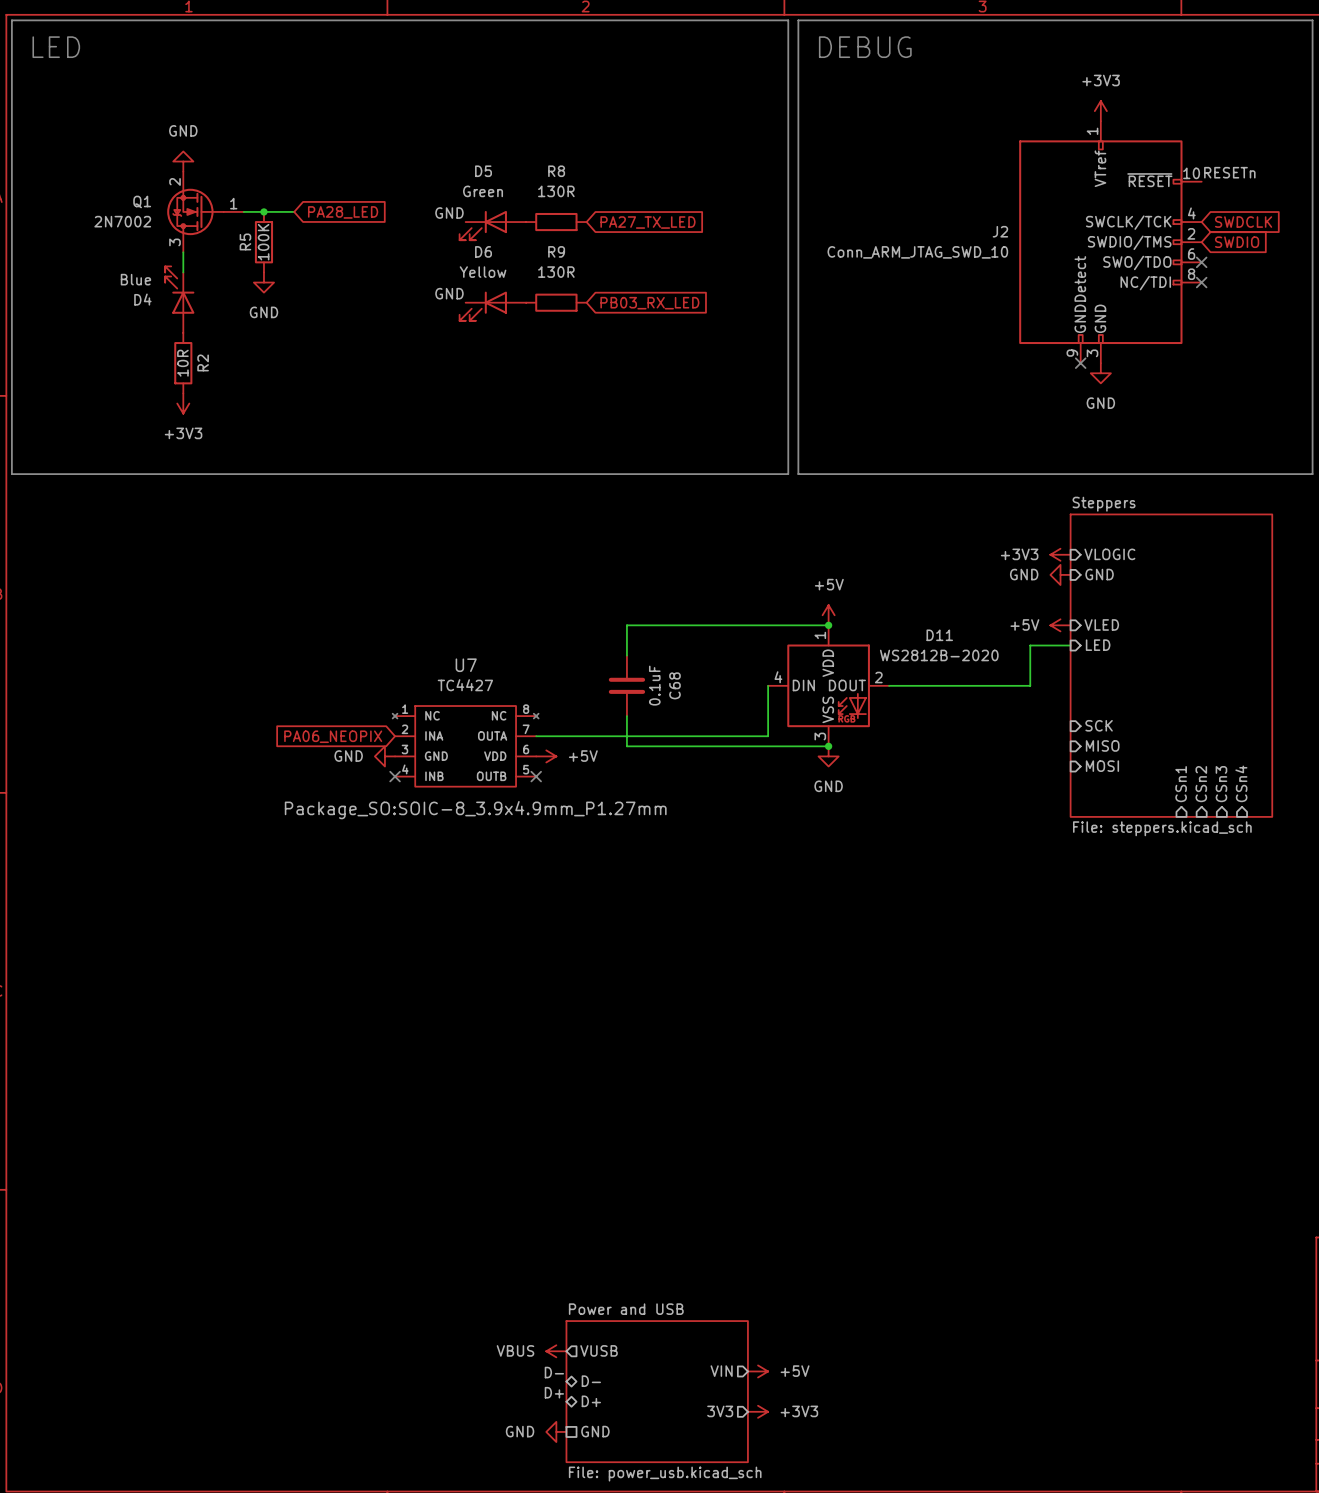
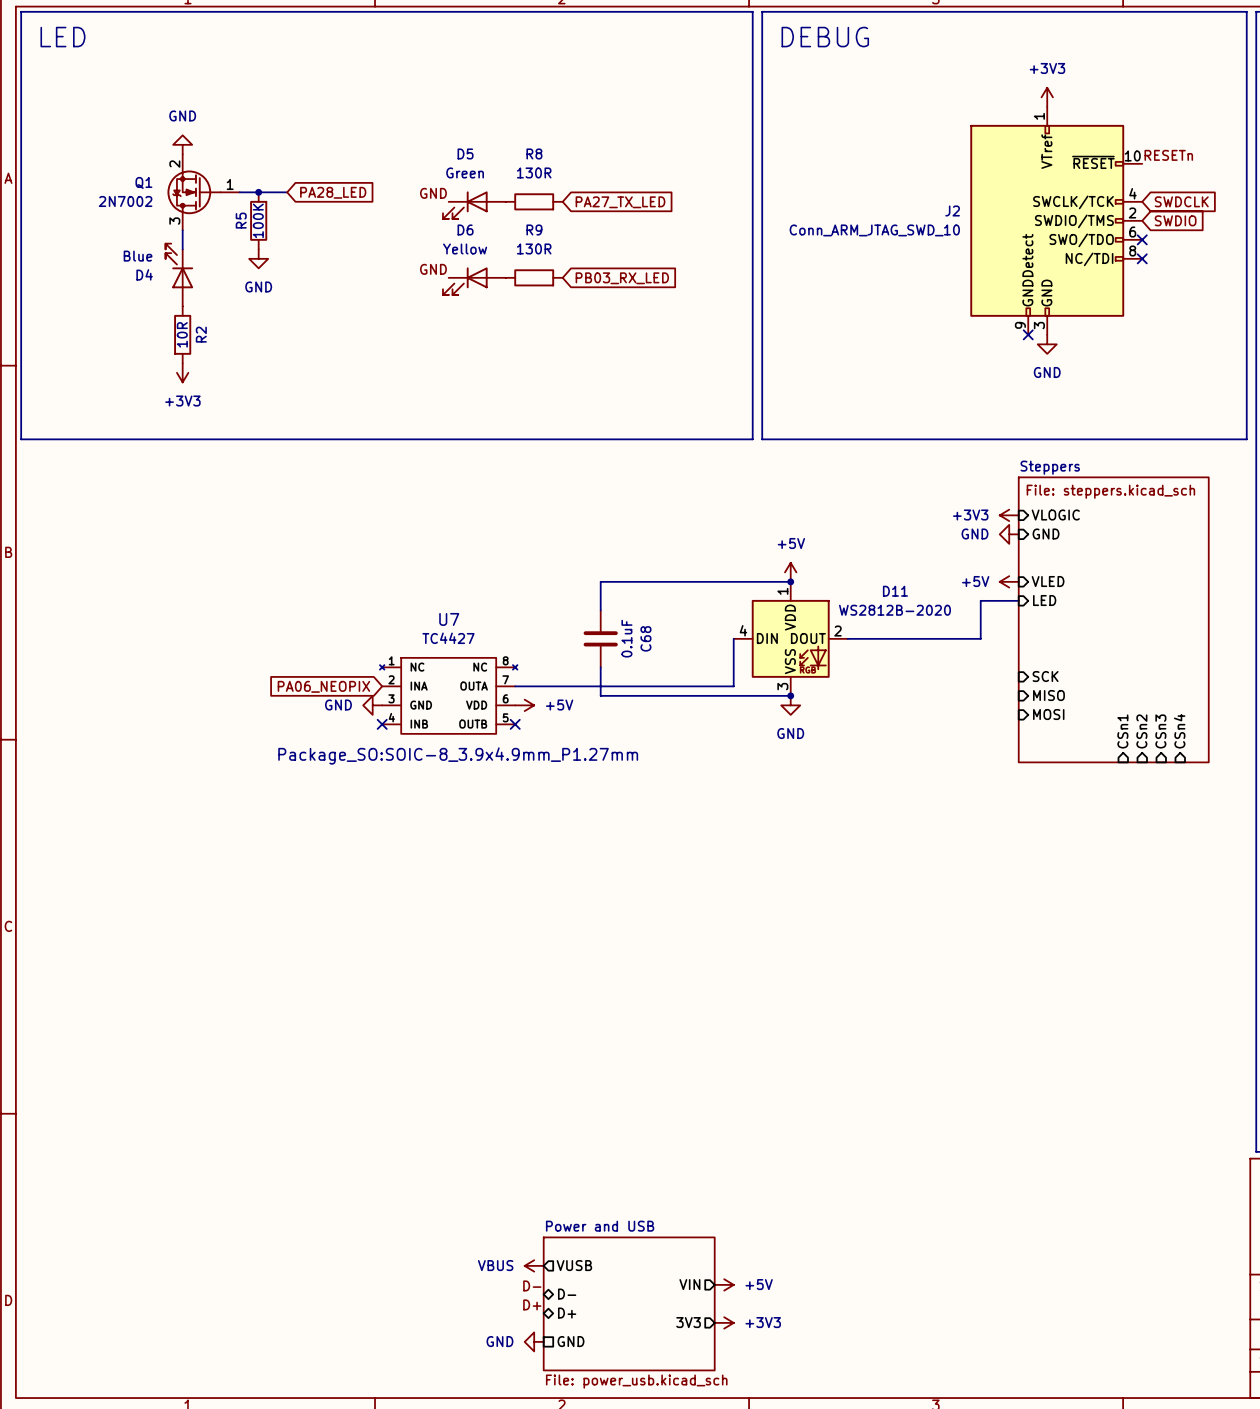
sheet Steppers value position: File: steppers.kicad_sch (1162, 828) -> File: steppers.kicad_sch (1110, 491)

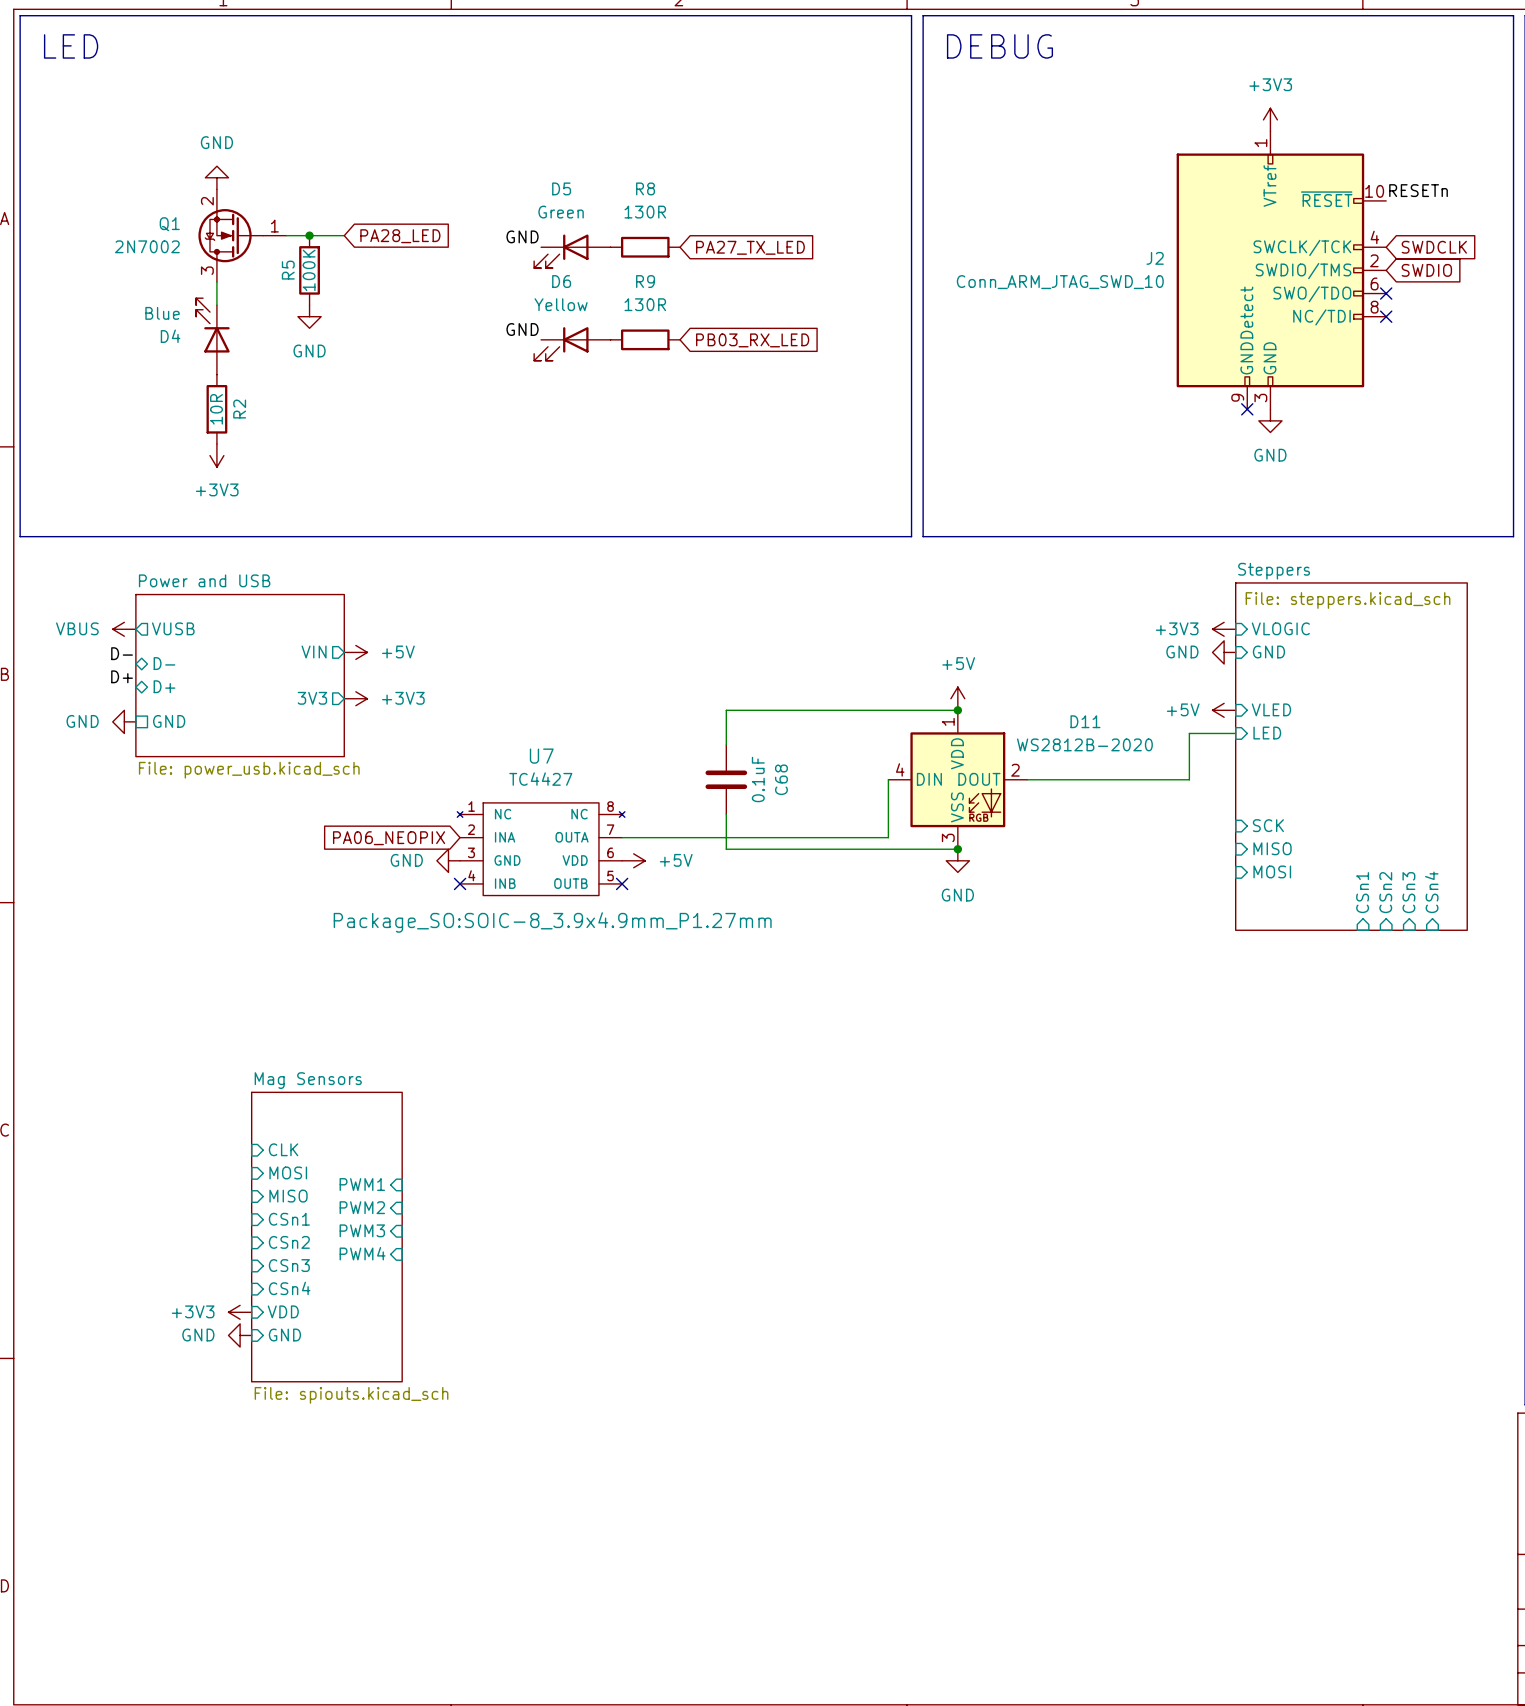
power symbol: none -> VBUS (124, 629)
sheet pin: none -> VUSB (173, 628)
sheet pin: none -> VIN (314, 651)
power symbol: none -> +5V (355, 652)
label: none -> D- (122, 653)
sheet pin: none -> D- (164, 663)
sheet Power and USB: none -> File: power_usb.kicad_sch (240, 675)
label: none -> D+ (122, 676)
sheet pin: none -> D+ (164, 686)
sheet pin: none -> 3V3 (312, 698)
power symbol: none -> +3V3 (355, 698)
power symbol: none -> GND (124, 721)
sheet pin: none -> GND (169, 721)
sheet pin: none -> CLK (283, 1149)
sheet pin: none -> MOSI (288, 1172)
sheet pin: none -> PWM1 (362, 1184)
sheet pin: none -> MISO (288, 1196)
sheet pin: none -> PWM2 (362, 1207)
sheet pin: none -> CSn1 (289, 1219)
sheet pin: none -> PWM3 (362, 1230)
sheet Mag Sensors: none -> File: spiouts.kicad_sch (326, 1237)
sheet pin: none -> CSn2 (289, 1242)
sheet pin: none -> PWM4 (362, 1253)
sheet pin: none -> CSn3 (289, 1265)
sheet pin: none -> CSn4 (289, 1288)
power symbol: none -> +3V3 (240, 1312)
sheet pin: none -> VDD (283, 1311)
power symbol: none -> GND (240, 1335)
sheet pin: none -> GND (284, 1335)
power symbol: VBUS (534, 1265) -> none
sheet pin: VUSB (574, 1265) -> none
sheet pin: VIN (689, 1284) -> none
power symbol: +5V (724, 1284) -> none
label: D- (532, 1285) -> none
sheet pin: D- (567, 1294) -> none
sheet Power and USB: File: power_usb.kicad_sch (629, 1303) -> none
label: D+ (532, 1304) -> none
sheet pin: D+ (567, 1313) -> none
sheet pin: 3V3 (688, 1322) -> none
power symbol: +3V3 (724, 1322) -> none
power symbol: GND (534, 1341) -> none
sheet pin: GND (570, 1341) -> none

